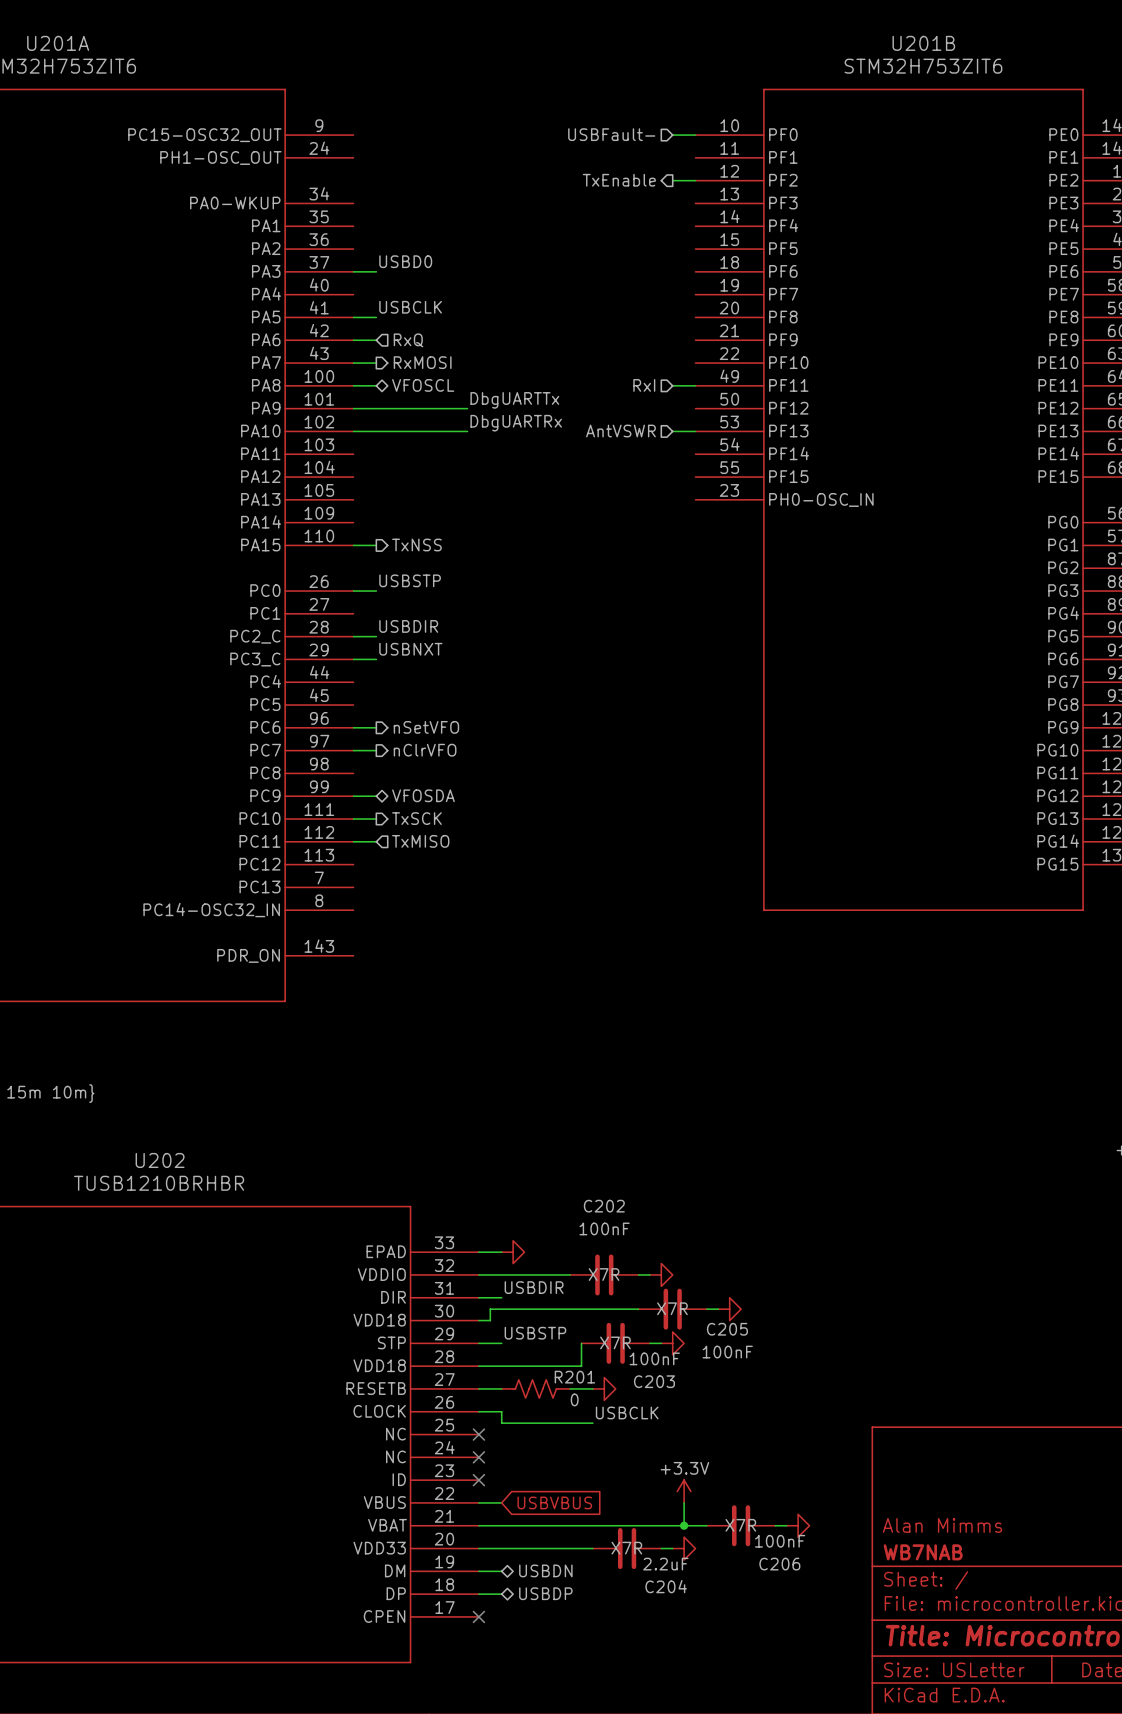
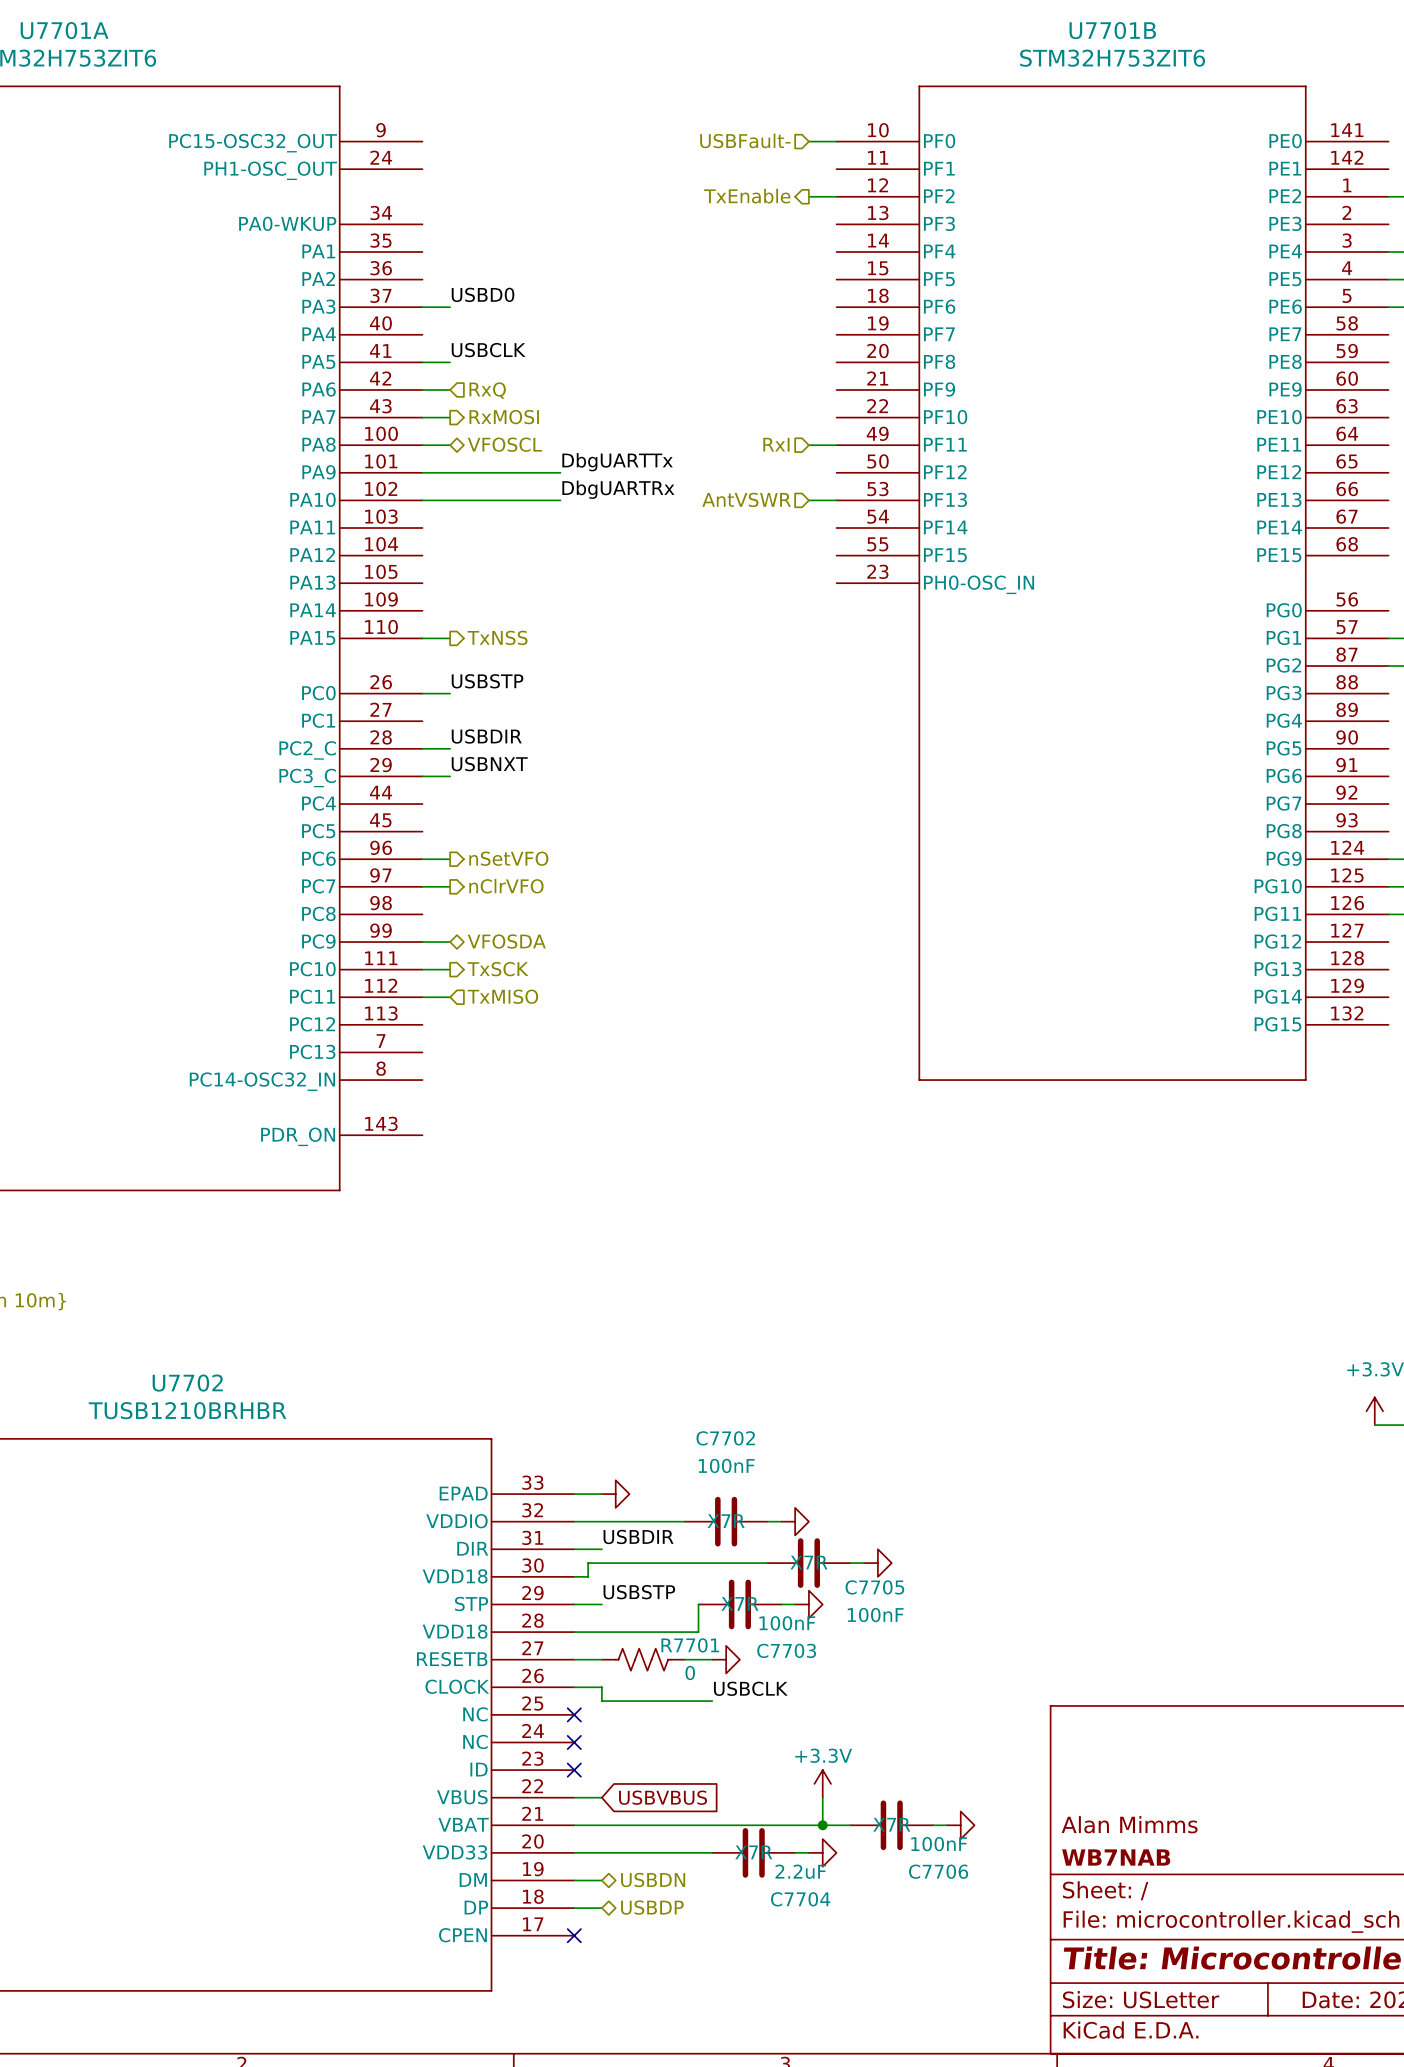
U201A name: U201A (58, 43) -> U7701A (64, 30)
U201B name: U201B (923, 43) -> U7701B (1112, 30)
U202 name: U202 (160, 1160) -> U7702 (187, 1383)
C202 name: C202 (604, 1206) -> C7702 (725, 1438)
C205 name: C205 (727, 1329) -> C7705 (874, 1587)
R201 name: R201 (574, 1377) -> R7701 (690, 1645)
C203 name: C203 (654, 1381) -> C7703 (786, 1650)
C206 name: C206 (779, 1564) -> C7706 (938, 1871)
C204 name: C204 (666, 1586) -> C7704 (800, 1899)

